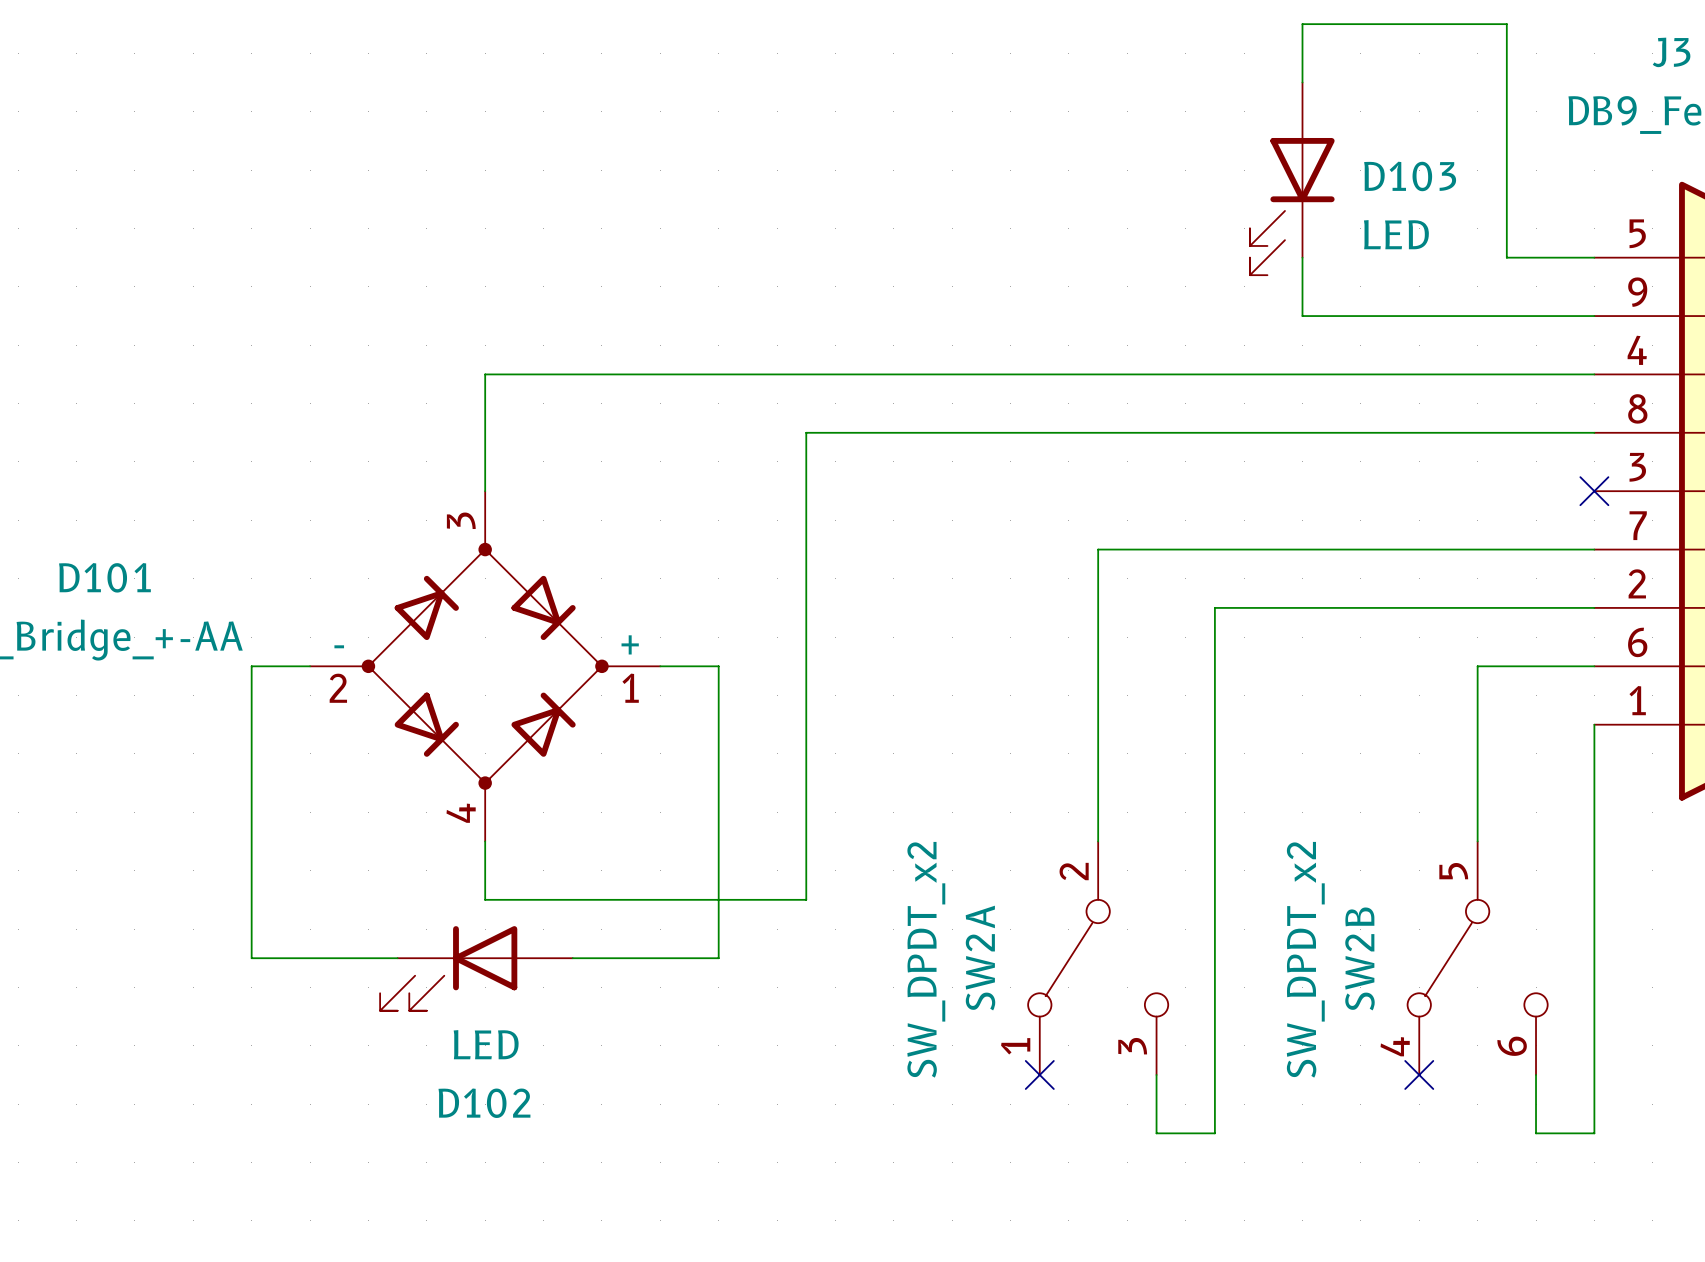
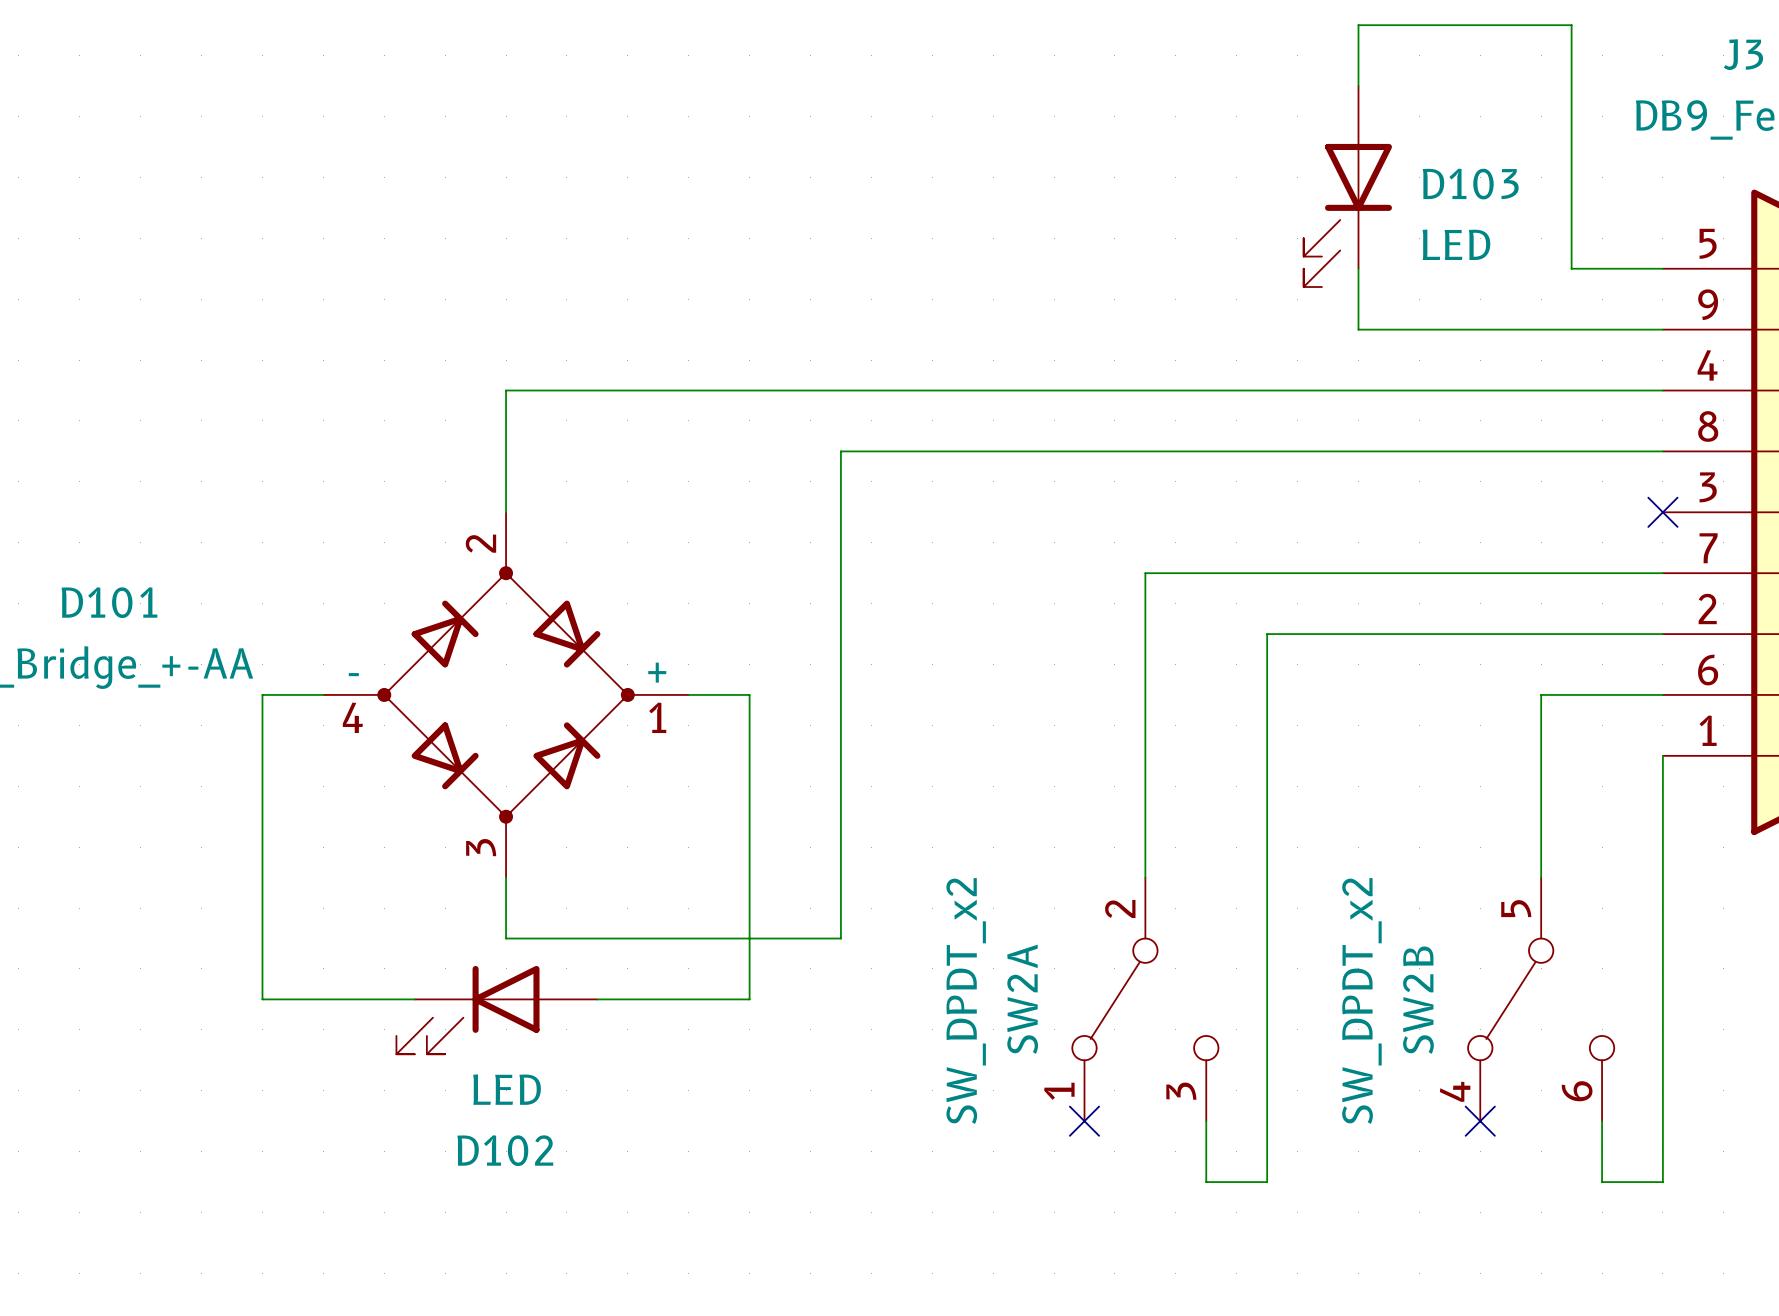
D101 pin number: 3 (461, 520) -> 2 (480, 543)
D101 pin number: 2 (338, 688) -> 4 (352, 717)
D101 pin number: 4 (461, 813) -> 3 (481, 847)

